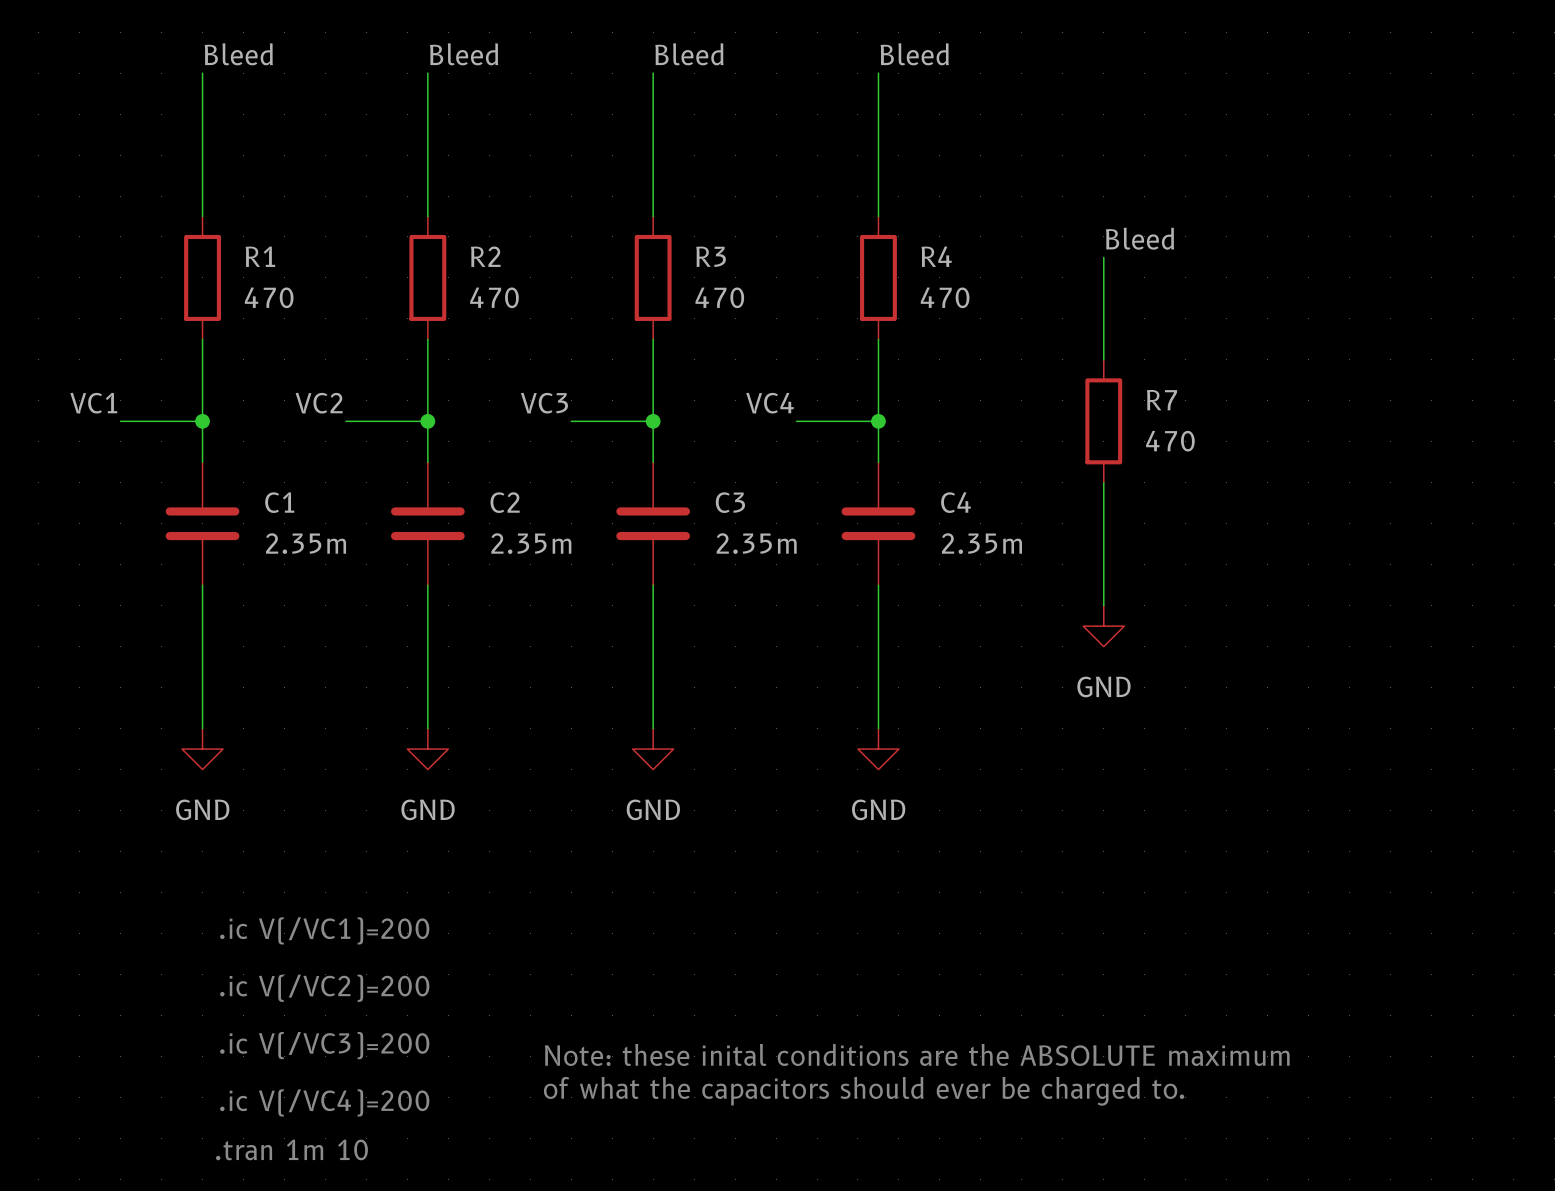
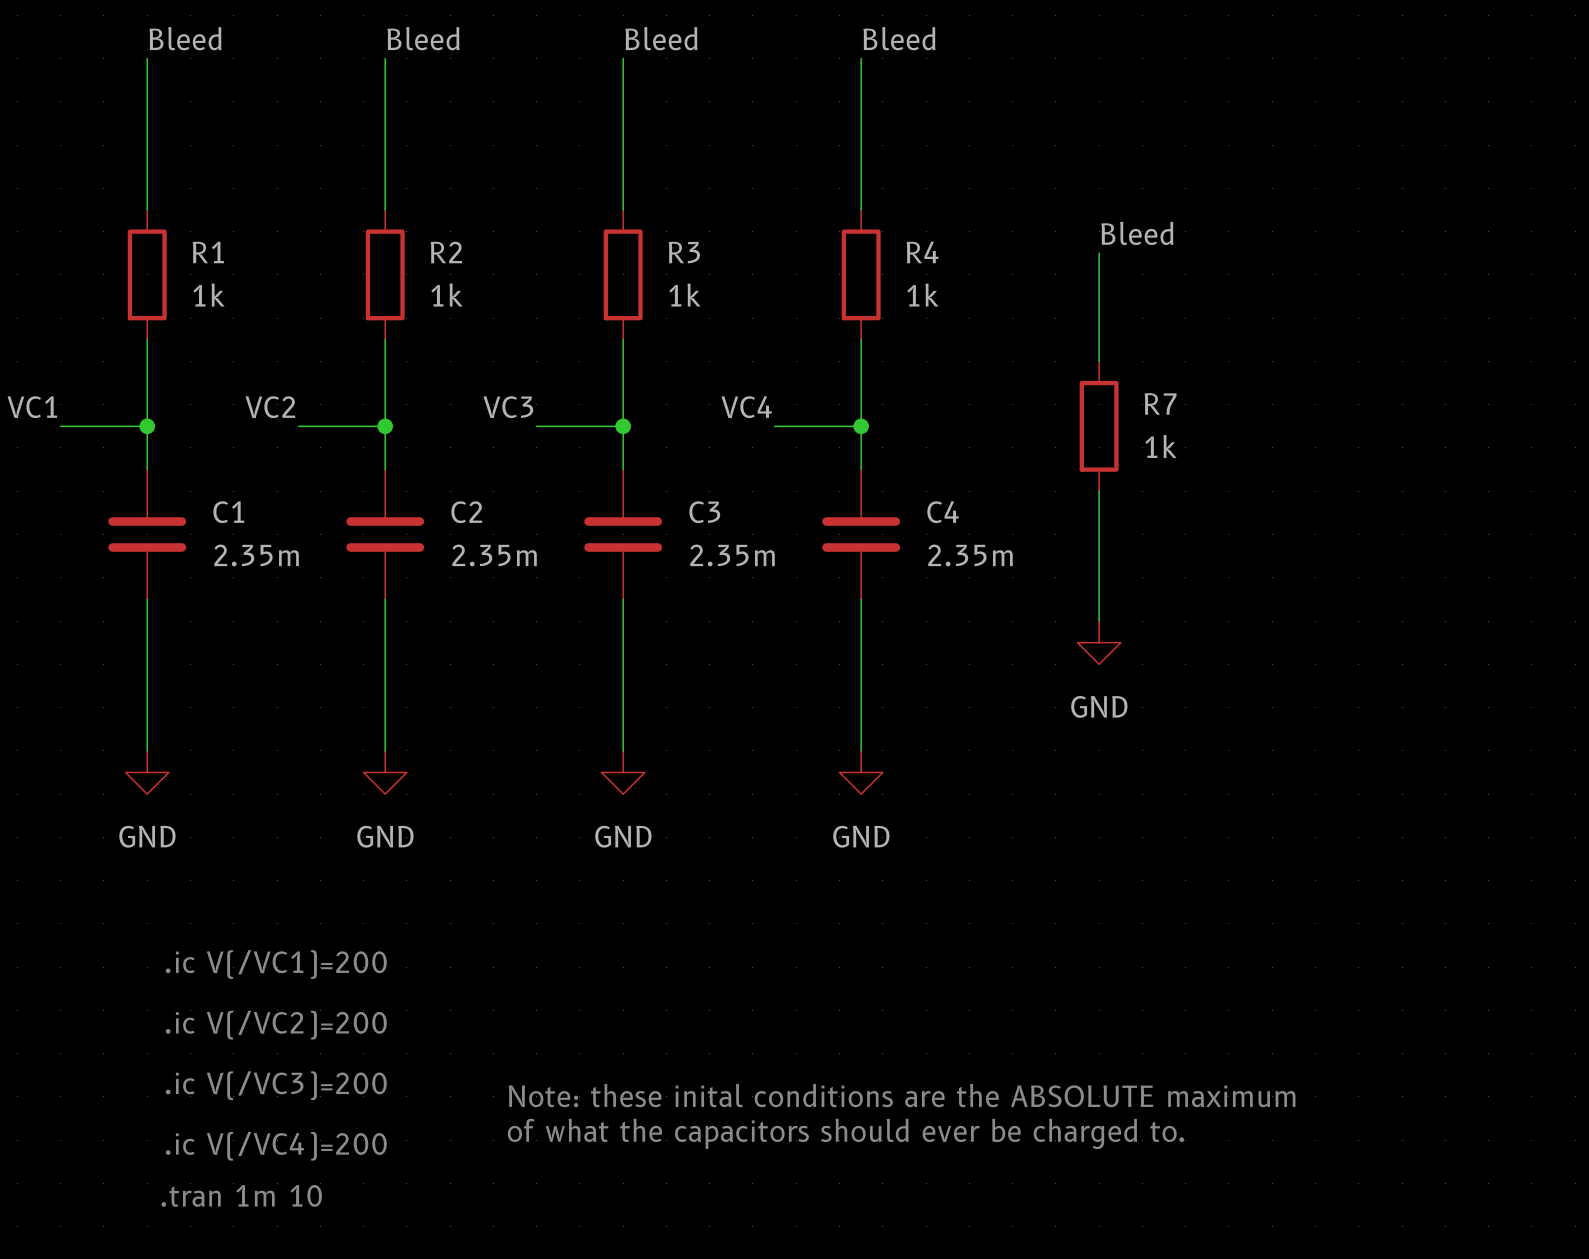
R1 value: 470 (269, 297) -> 1k (208, 295)
R2 value: 470 (494, 297) -> 1k (446, 295)
R3 value: 470 (719, 297) -> 1k (684, 295)
R4 value: 470 (945, 297) -> 1k (922, 295)
R7 value: 470 (1170, 441) -> 1k (1160, 446)

